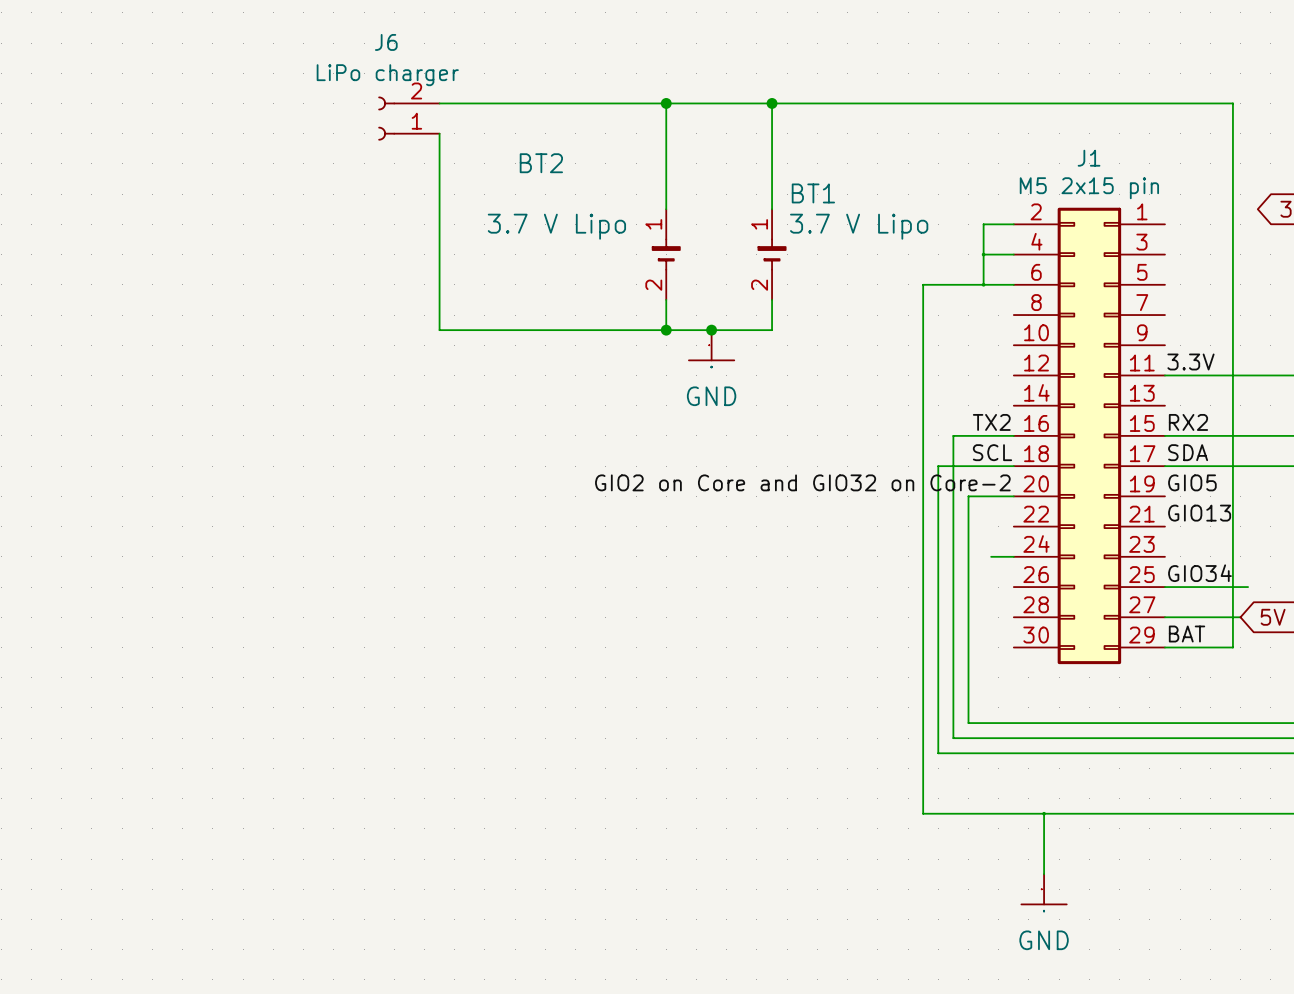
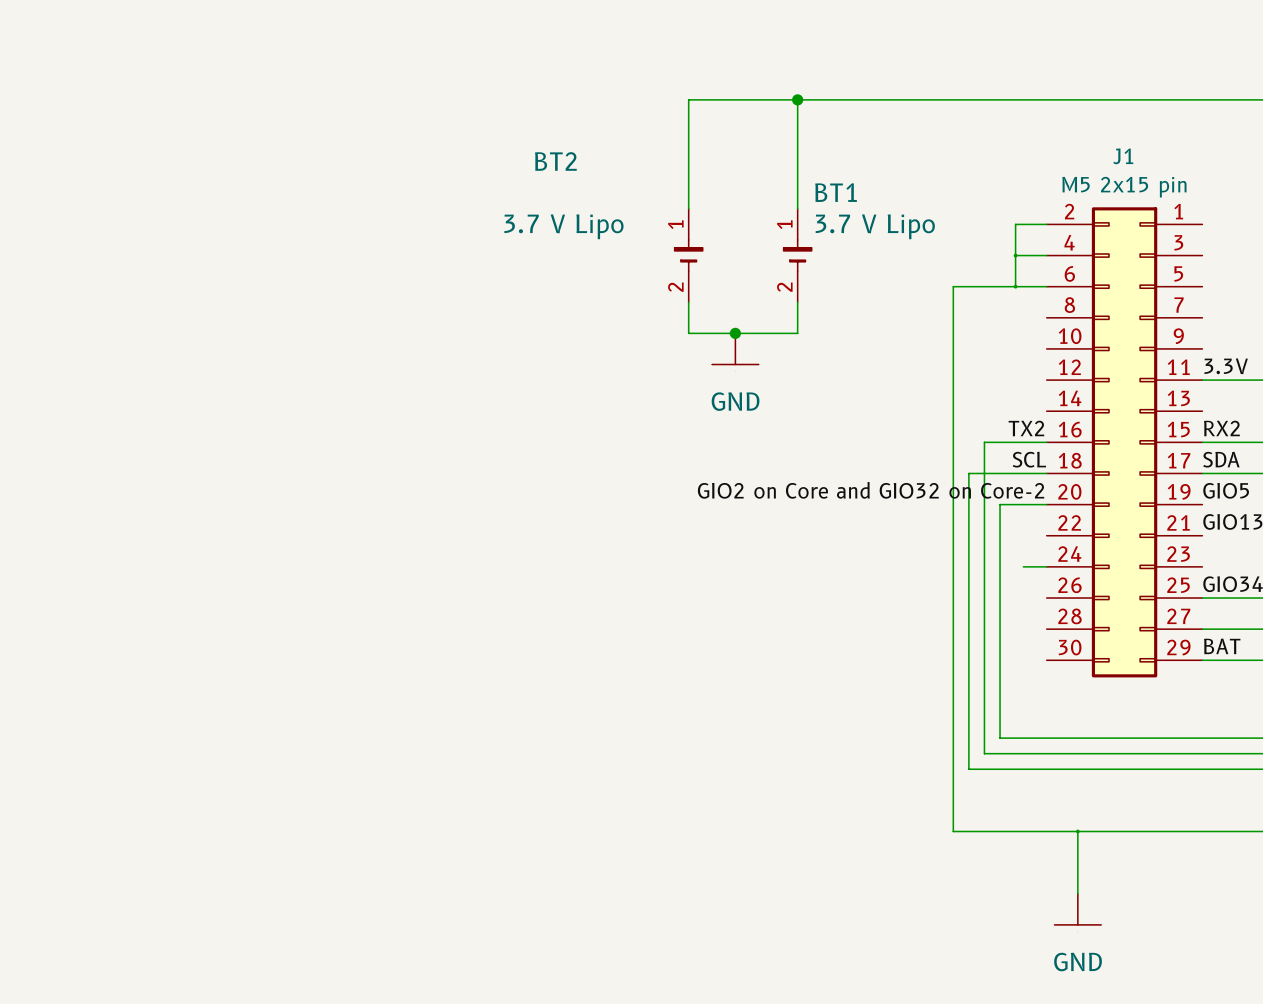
wire: (439, 103) (666, 103) -> none
junction: (666, 103) -> none
J6: LiPo charger (408, 118) -> none
wire: (439, 133) (439, 330) (666, 330) -> none
junction: (666, 330) -> none

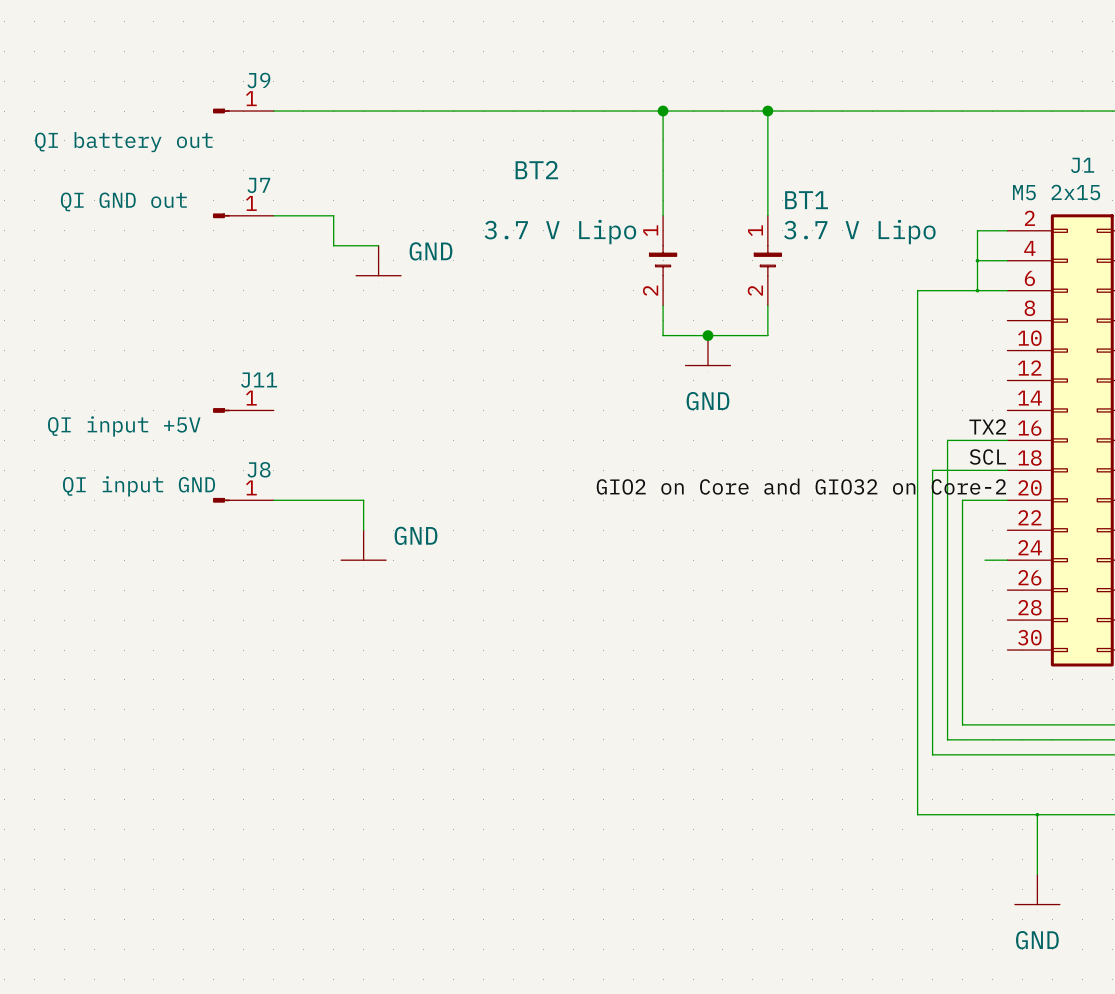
J9: none -> QI battery out (243, 111)
wire: none -> (273, 111) (663, 111)
junction: none -> (663, 111)
J7: none -> QI GND out (243, 215)
wire: none -> (273, 215) (333, 215) (333, 245) (378, 245)
power symbol: none -> GND (378, 260)
J11: none -> QI input +5V (243, 410)
J8: none -> QI input GND (243, 500)
wire: none -> (273, 500) (363, 500) (363, 530)
power symbol: none -> GND (363, 545)

